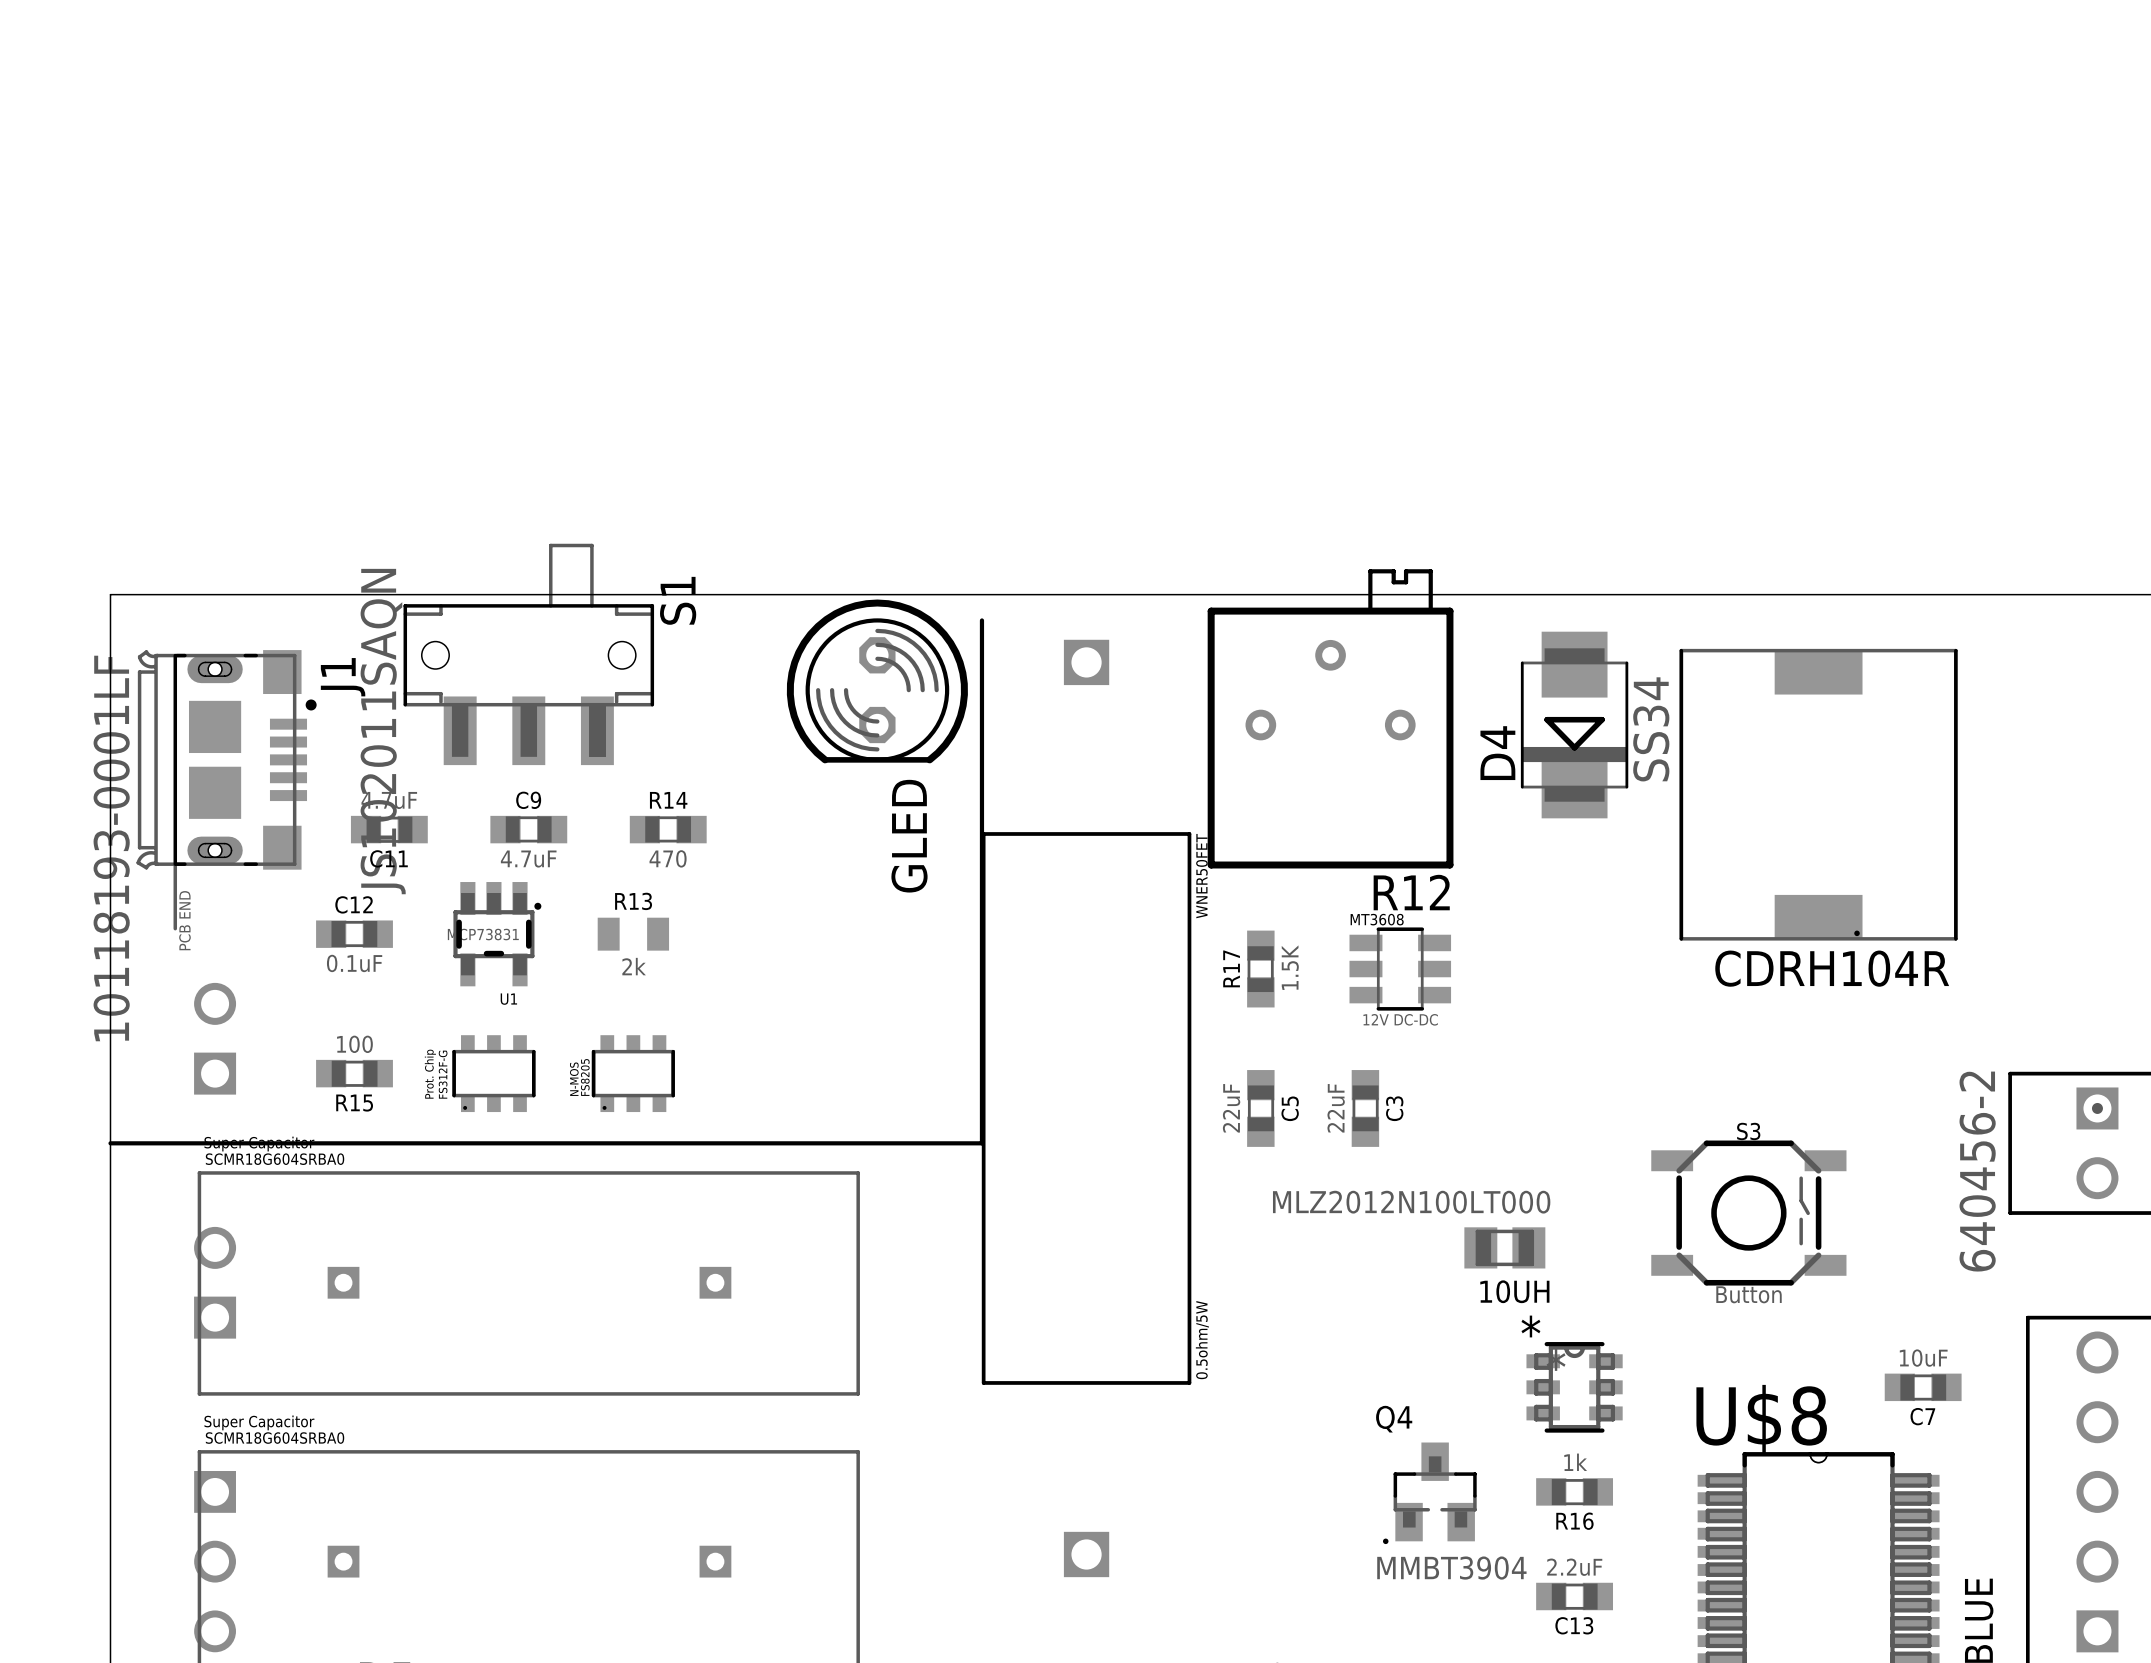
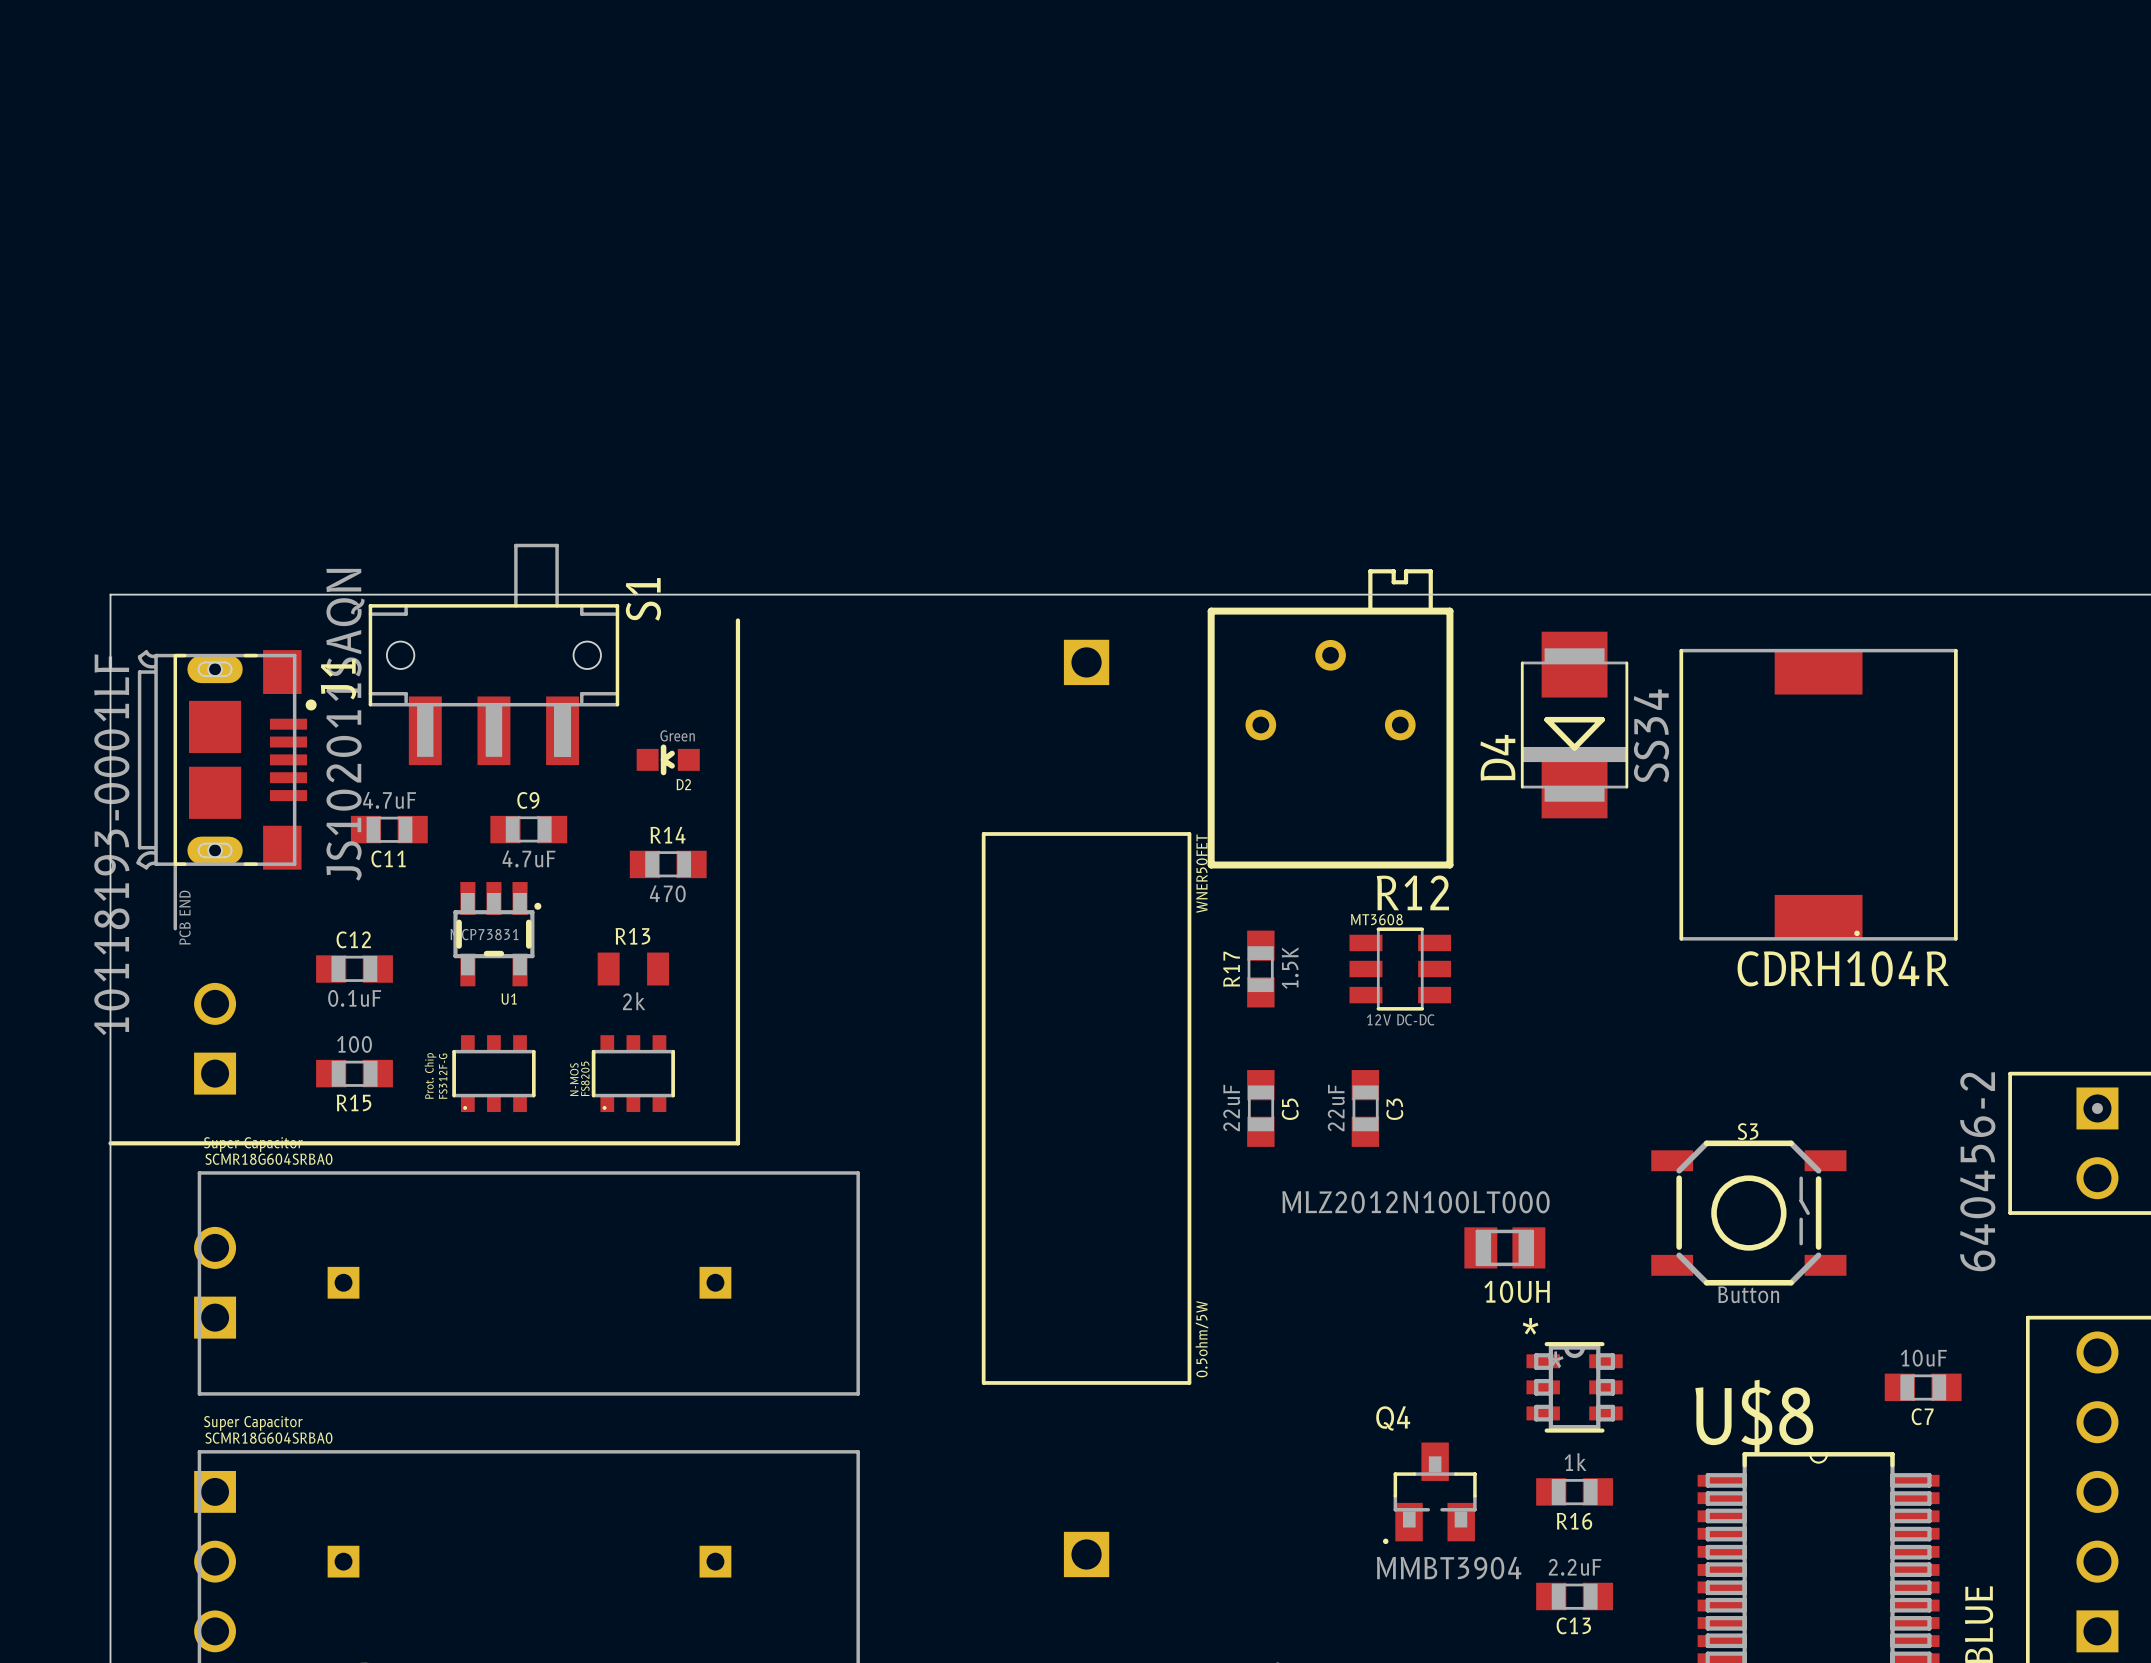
line: (981, 620) (981, 1143) (737, 1143) -> (737, 620) (737, 1143)
S1 position: (528, 654) -> (493, 654)
GLED: (877, 681) -> none
D2: none -> Green (668, 759)
R14 position: (668, 829) -> (668, 864)
C12 position: (354, 934) -> (354, 969)
R13 position: (633, 934) -> (633, 969)

